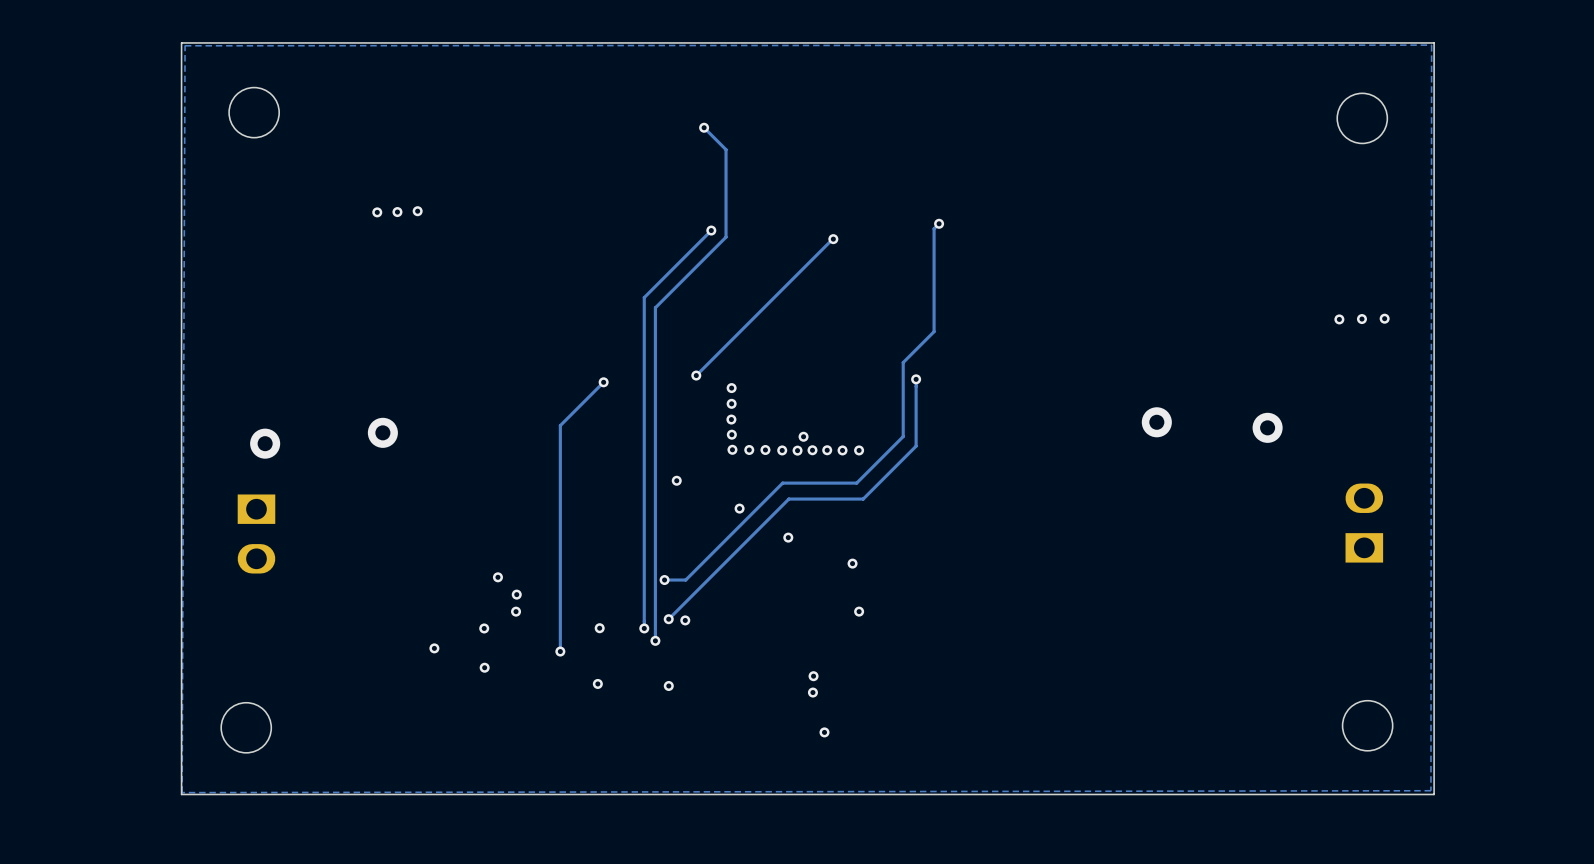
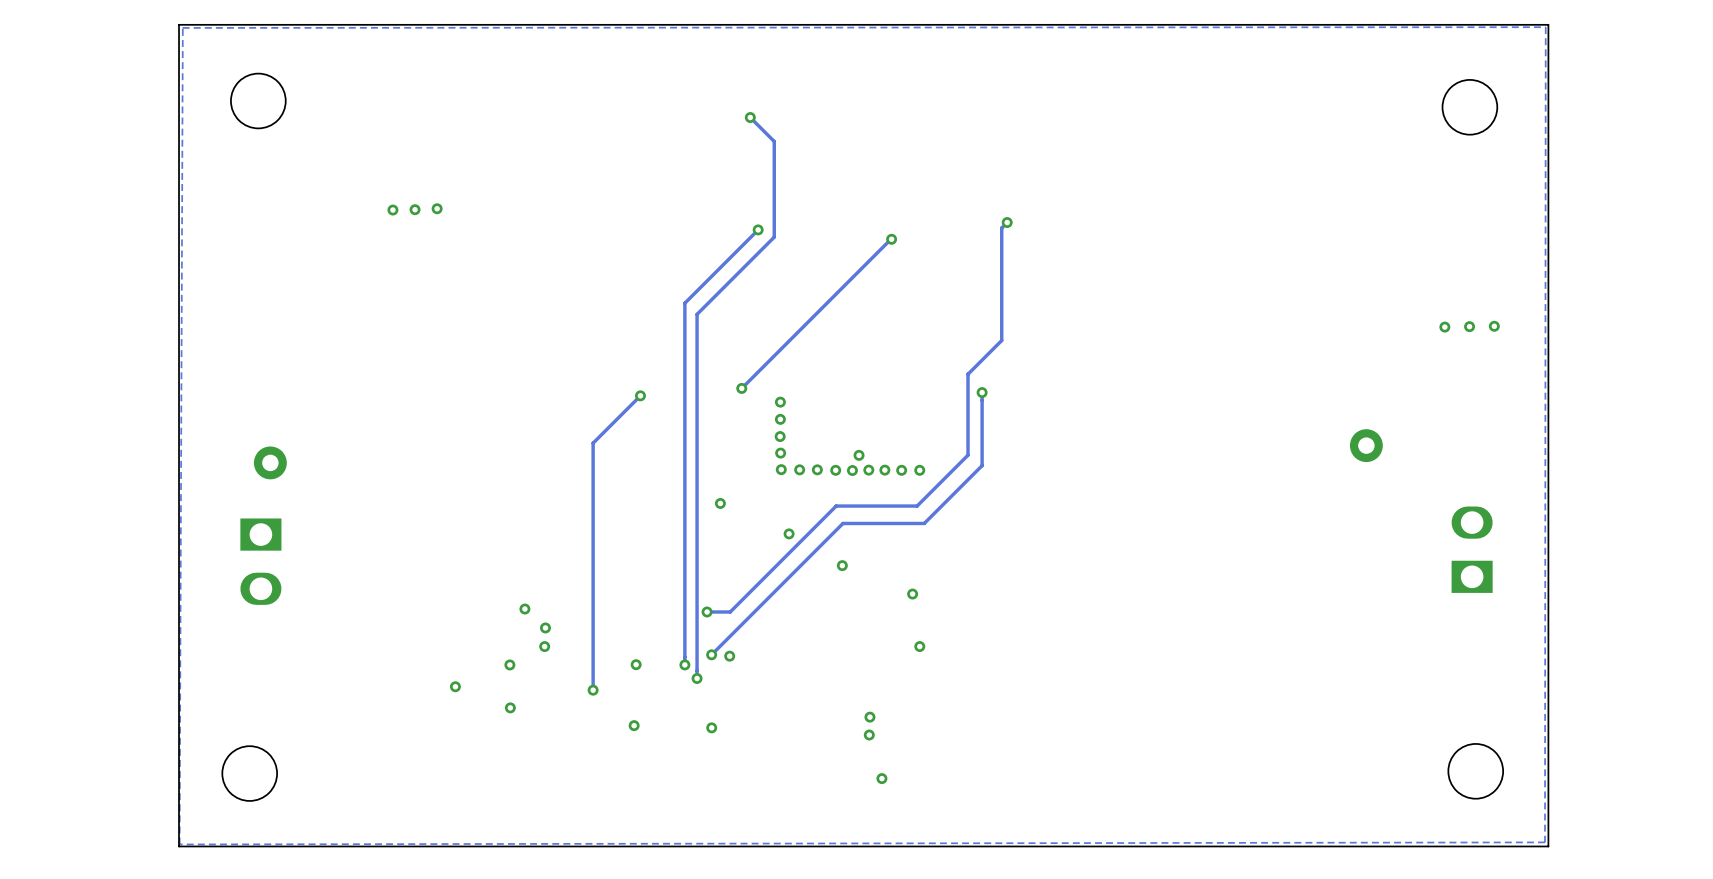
via: (1156, 422) -> none
via: (382, 432) -> none

